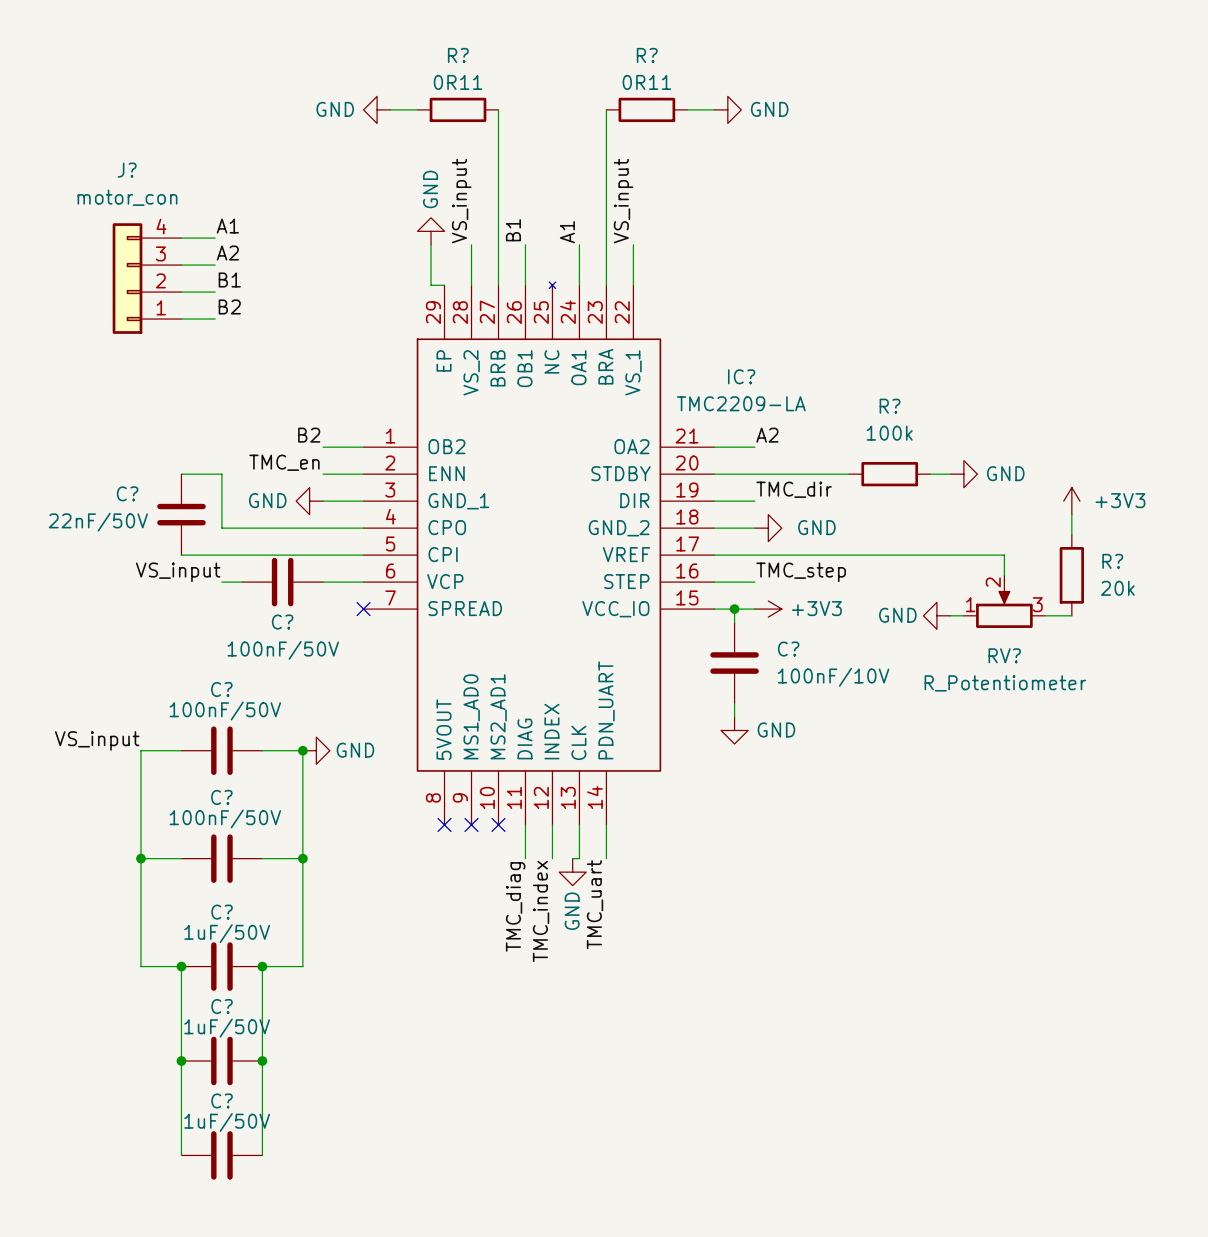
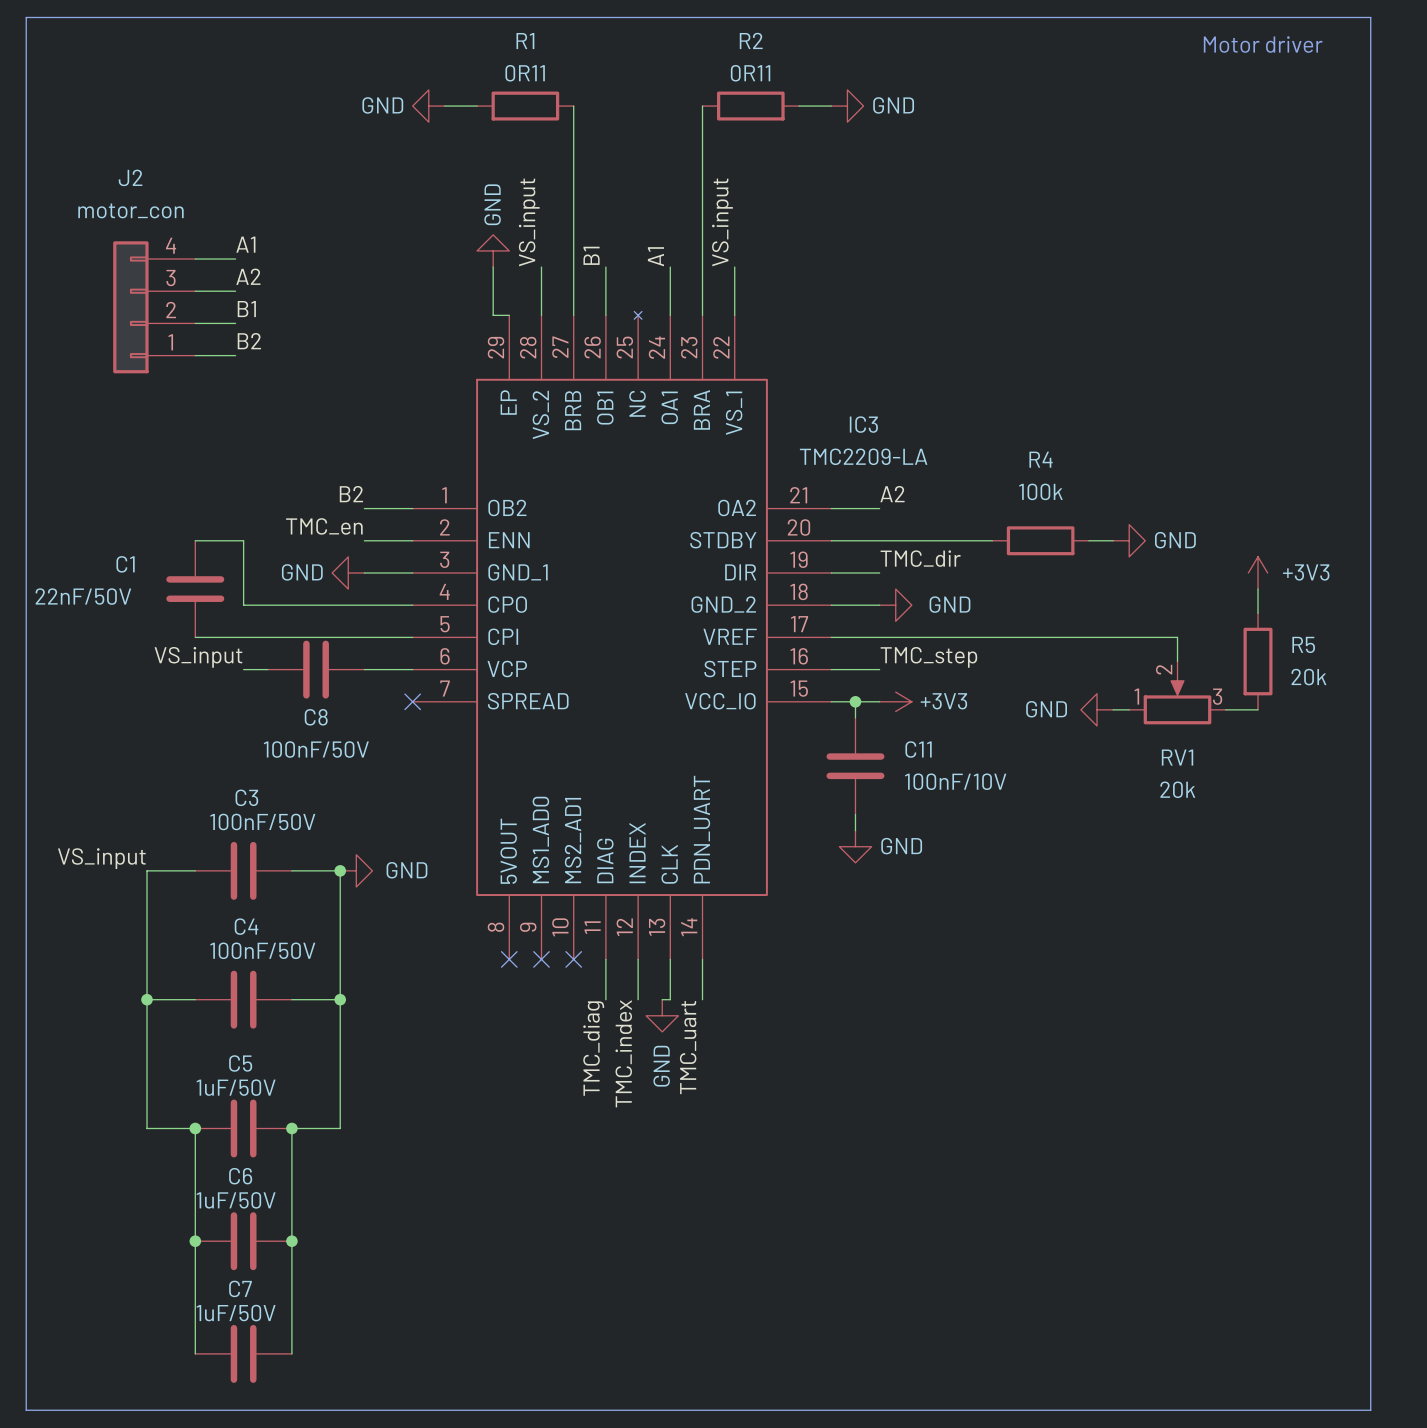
line: none -> (26, 17) (26, 1410) (1370, 1410) (1370, 17) (26, 17)
R? name: R? (458, 55) -> R1 (525, 41)
R? name: R? (647, 55) -> R2 (751, 40)
text: none -> Motor driver (1263, 44)
J? name: J? (127, 170) -> J2 (130, 177)
IC? name: IC? (741, 376) -> IC3 (863, 424)
R? name: R? (890, 406) -> R4 (1041, 459)
C? name: C? (127, 493) -> C1 (125, 564)
R? name: R? (1112, 561) -> R5 (1303, 644)
C? name: C? (282, 622) -> C8 (316, 717)
C? name: C? (788, 649) -> C11 (918, 749)
RV? name: RV? (1004, 655) -> RV1 (1177, 757)
RV? value: R_Potentiometer (1005, 683) -> 20k (1177, 789)
C? name: C? (221, 689) -> C3 (246, 797)
C? name: C? (221, 797) -> C4 (246, 926)
C? name: C? (222, 912) -> C5 (240, 1063)
C? name: C? (222, 1006) -> C6 (240, 1176)
C? name: C? (222, 1100) -> C7 (240, 1288)

